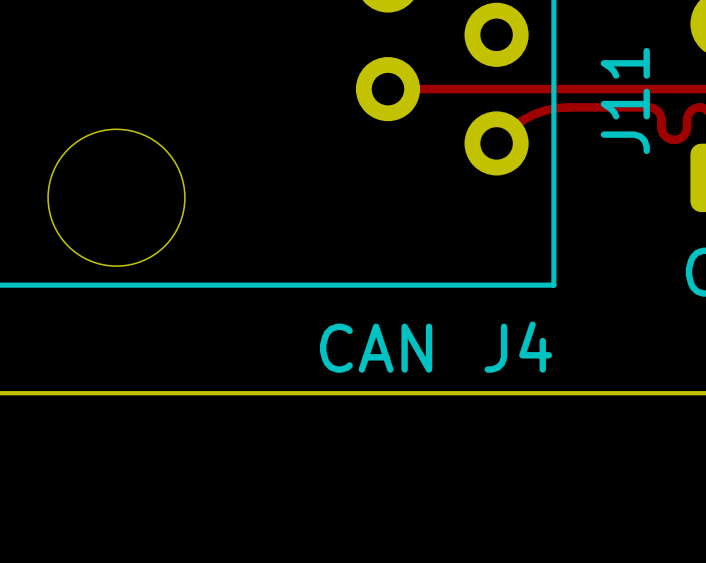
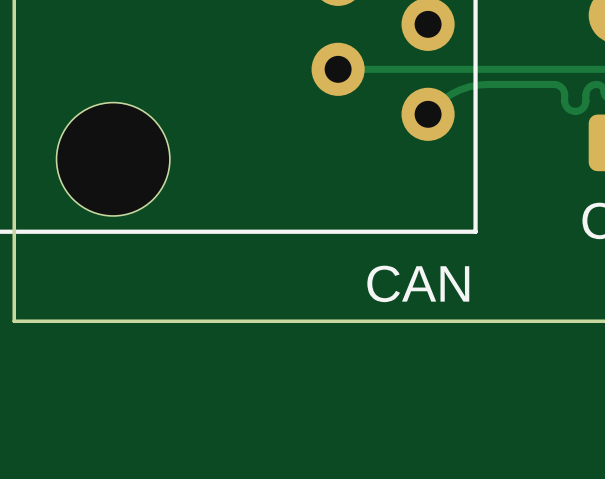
J11 name: J11 (625, 101) -> none
J4 name: J4 (518, 347) -> none
J4 value position: CAN (376, 348) -> CAN (418, 283)

